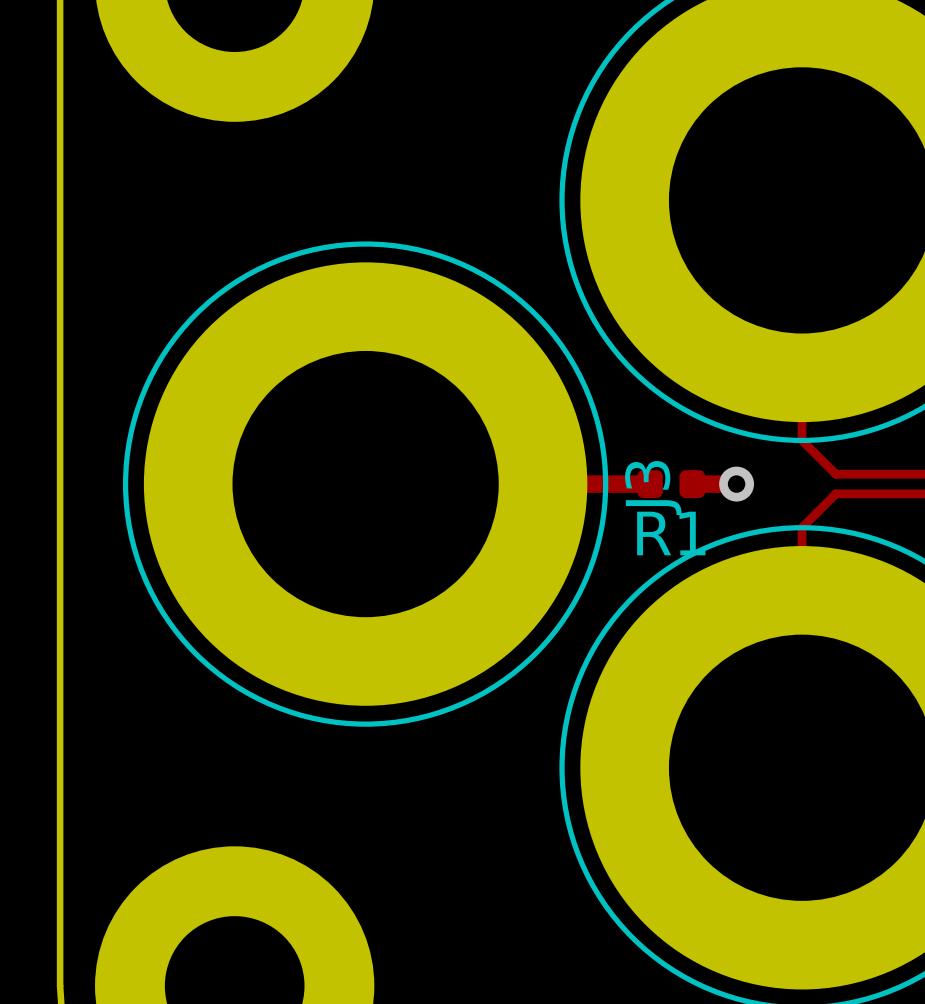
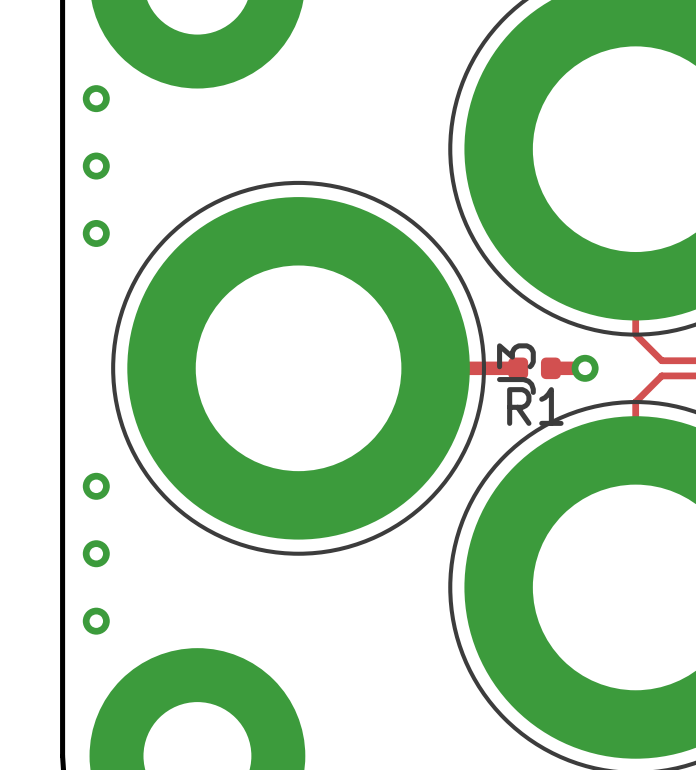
via: none -> (96, 98)
via: none -> (96, 166)
via: none -> (96, 233)
via: none -> (96, 486)
via: none -> (96, 553)
via: none -> (96, 621)

